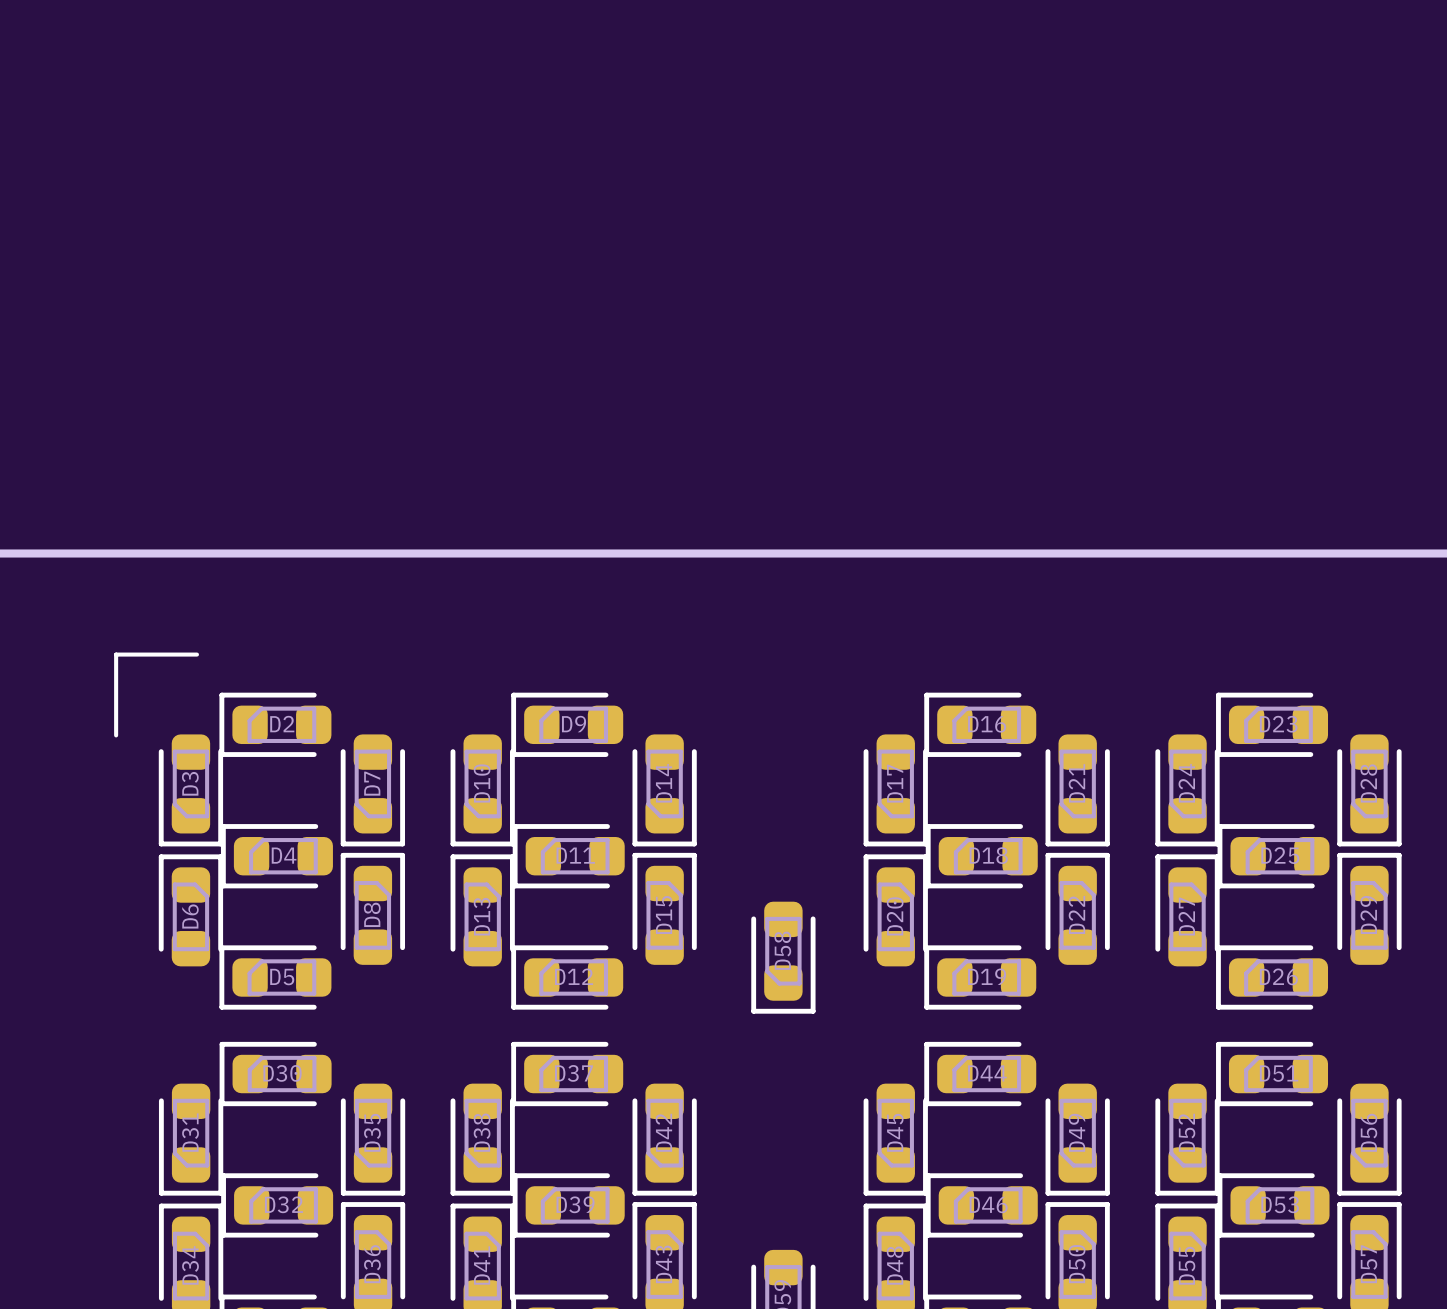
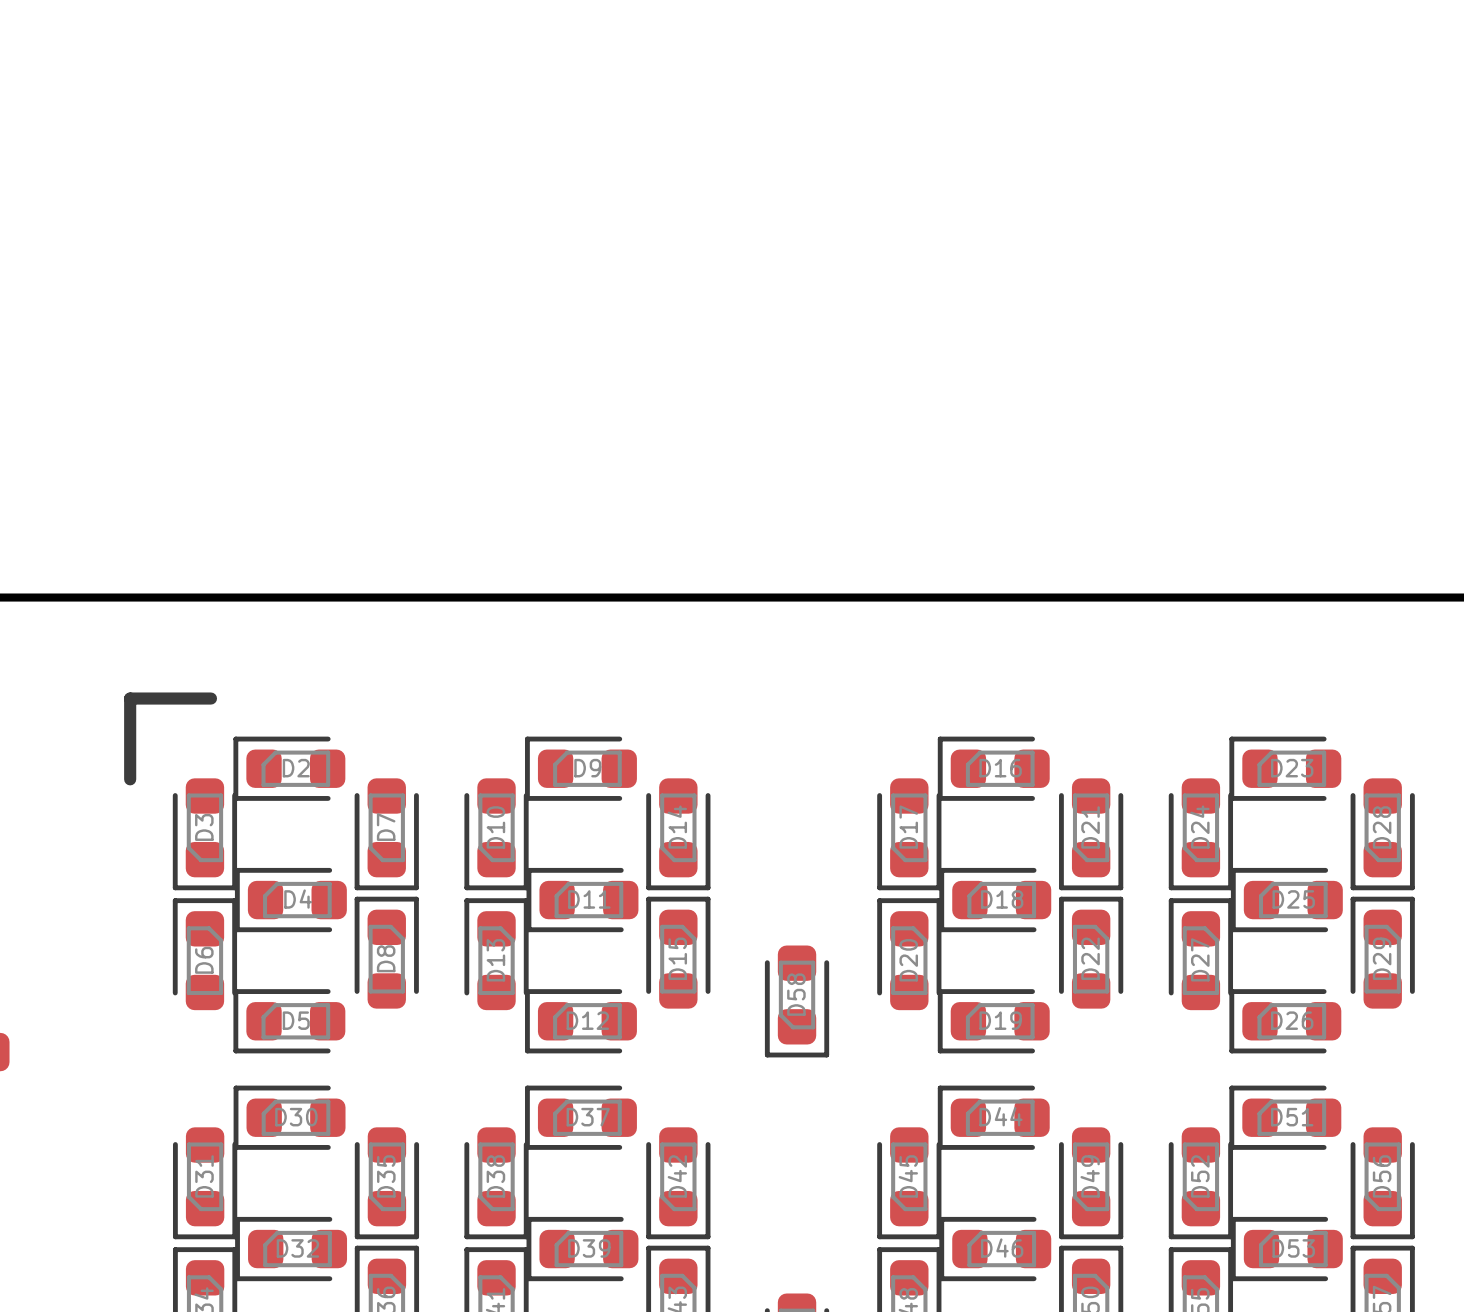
line width: thin (196, 654) (116, 654) (116, 735) -> thick (210, 698) (130, 698) (130, 779)

